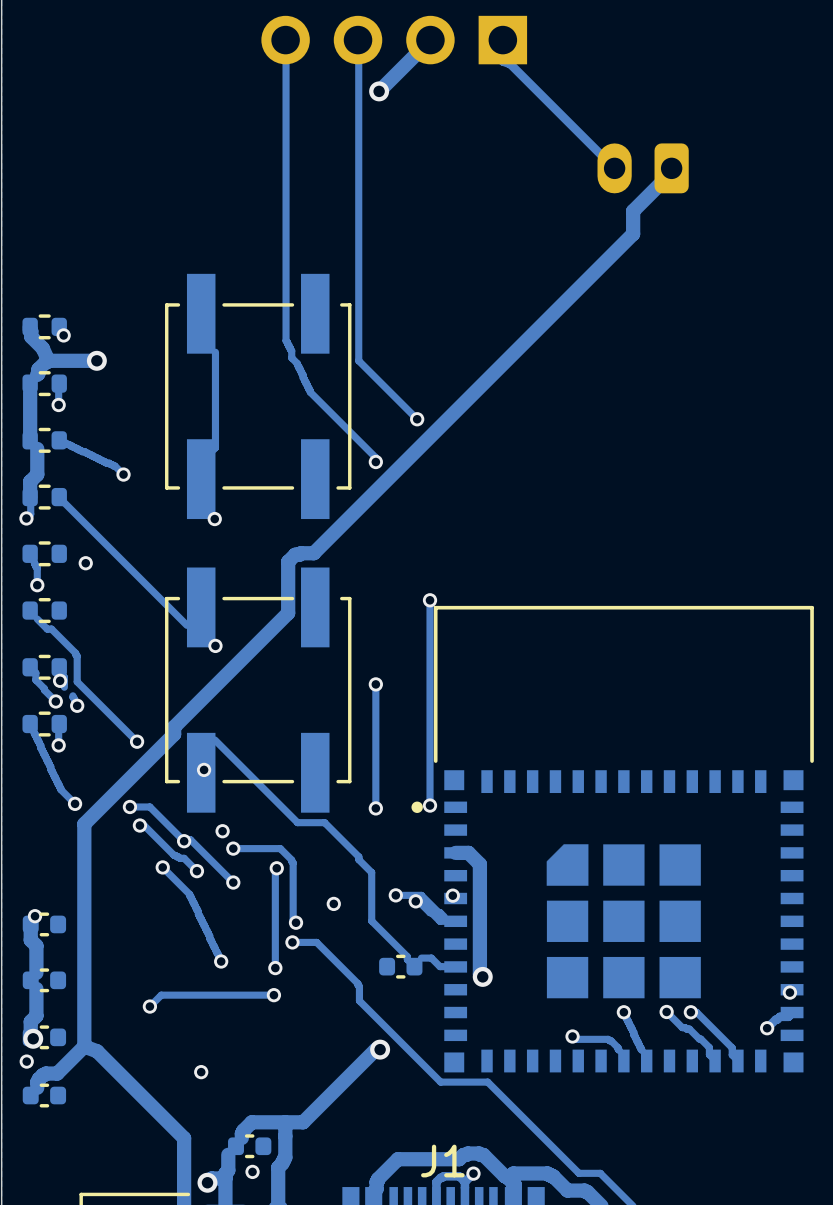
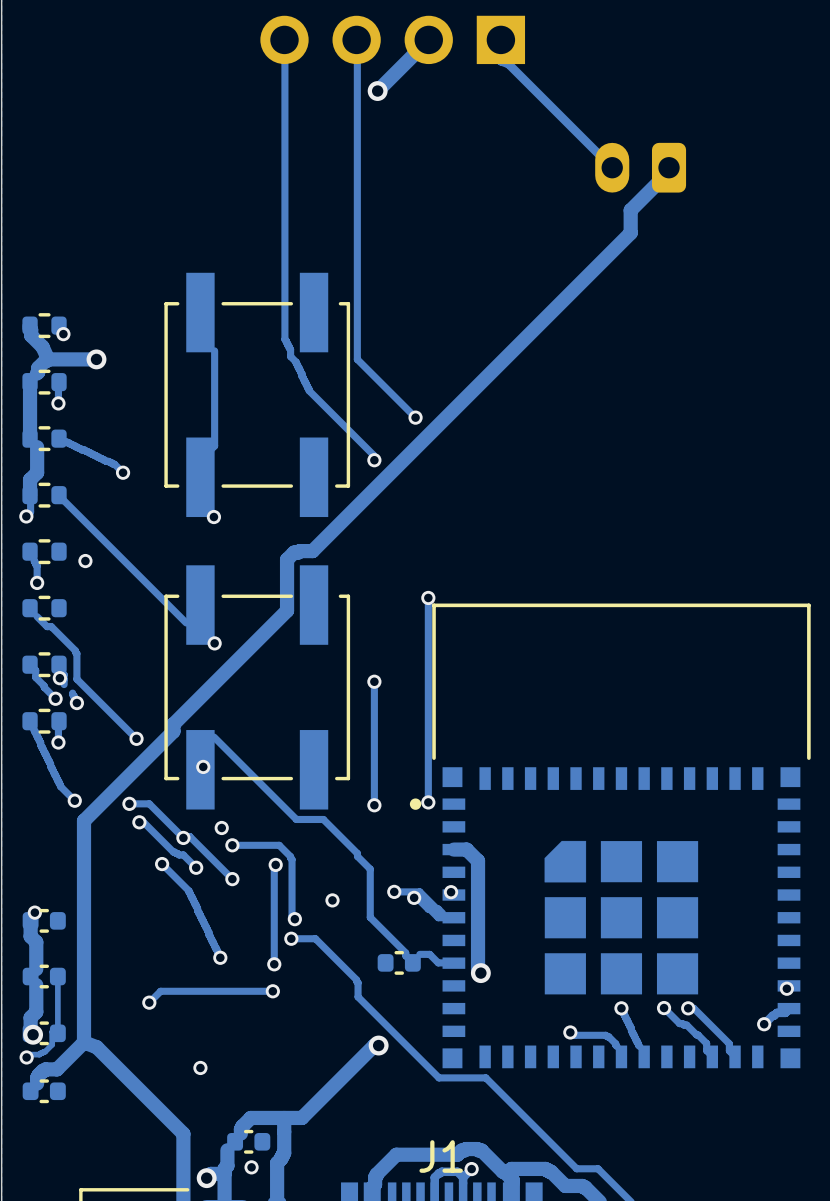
track: none -> (57, 976) (57, 1026) (52, 1031) (52, 1044) (42, 1053) (29, 1054) (26, 1057)

